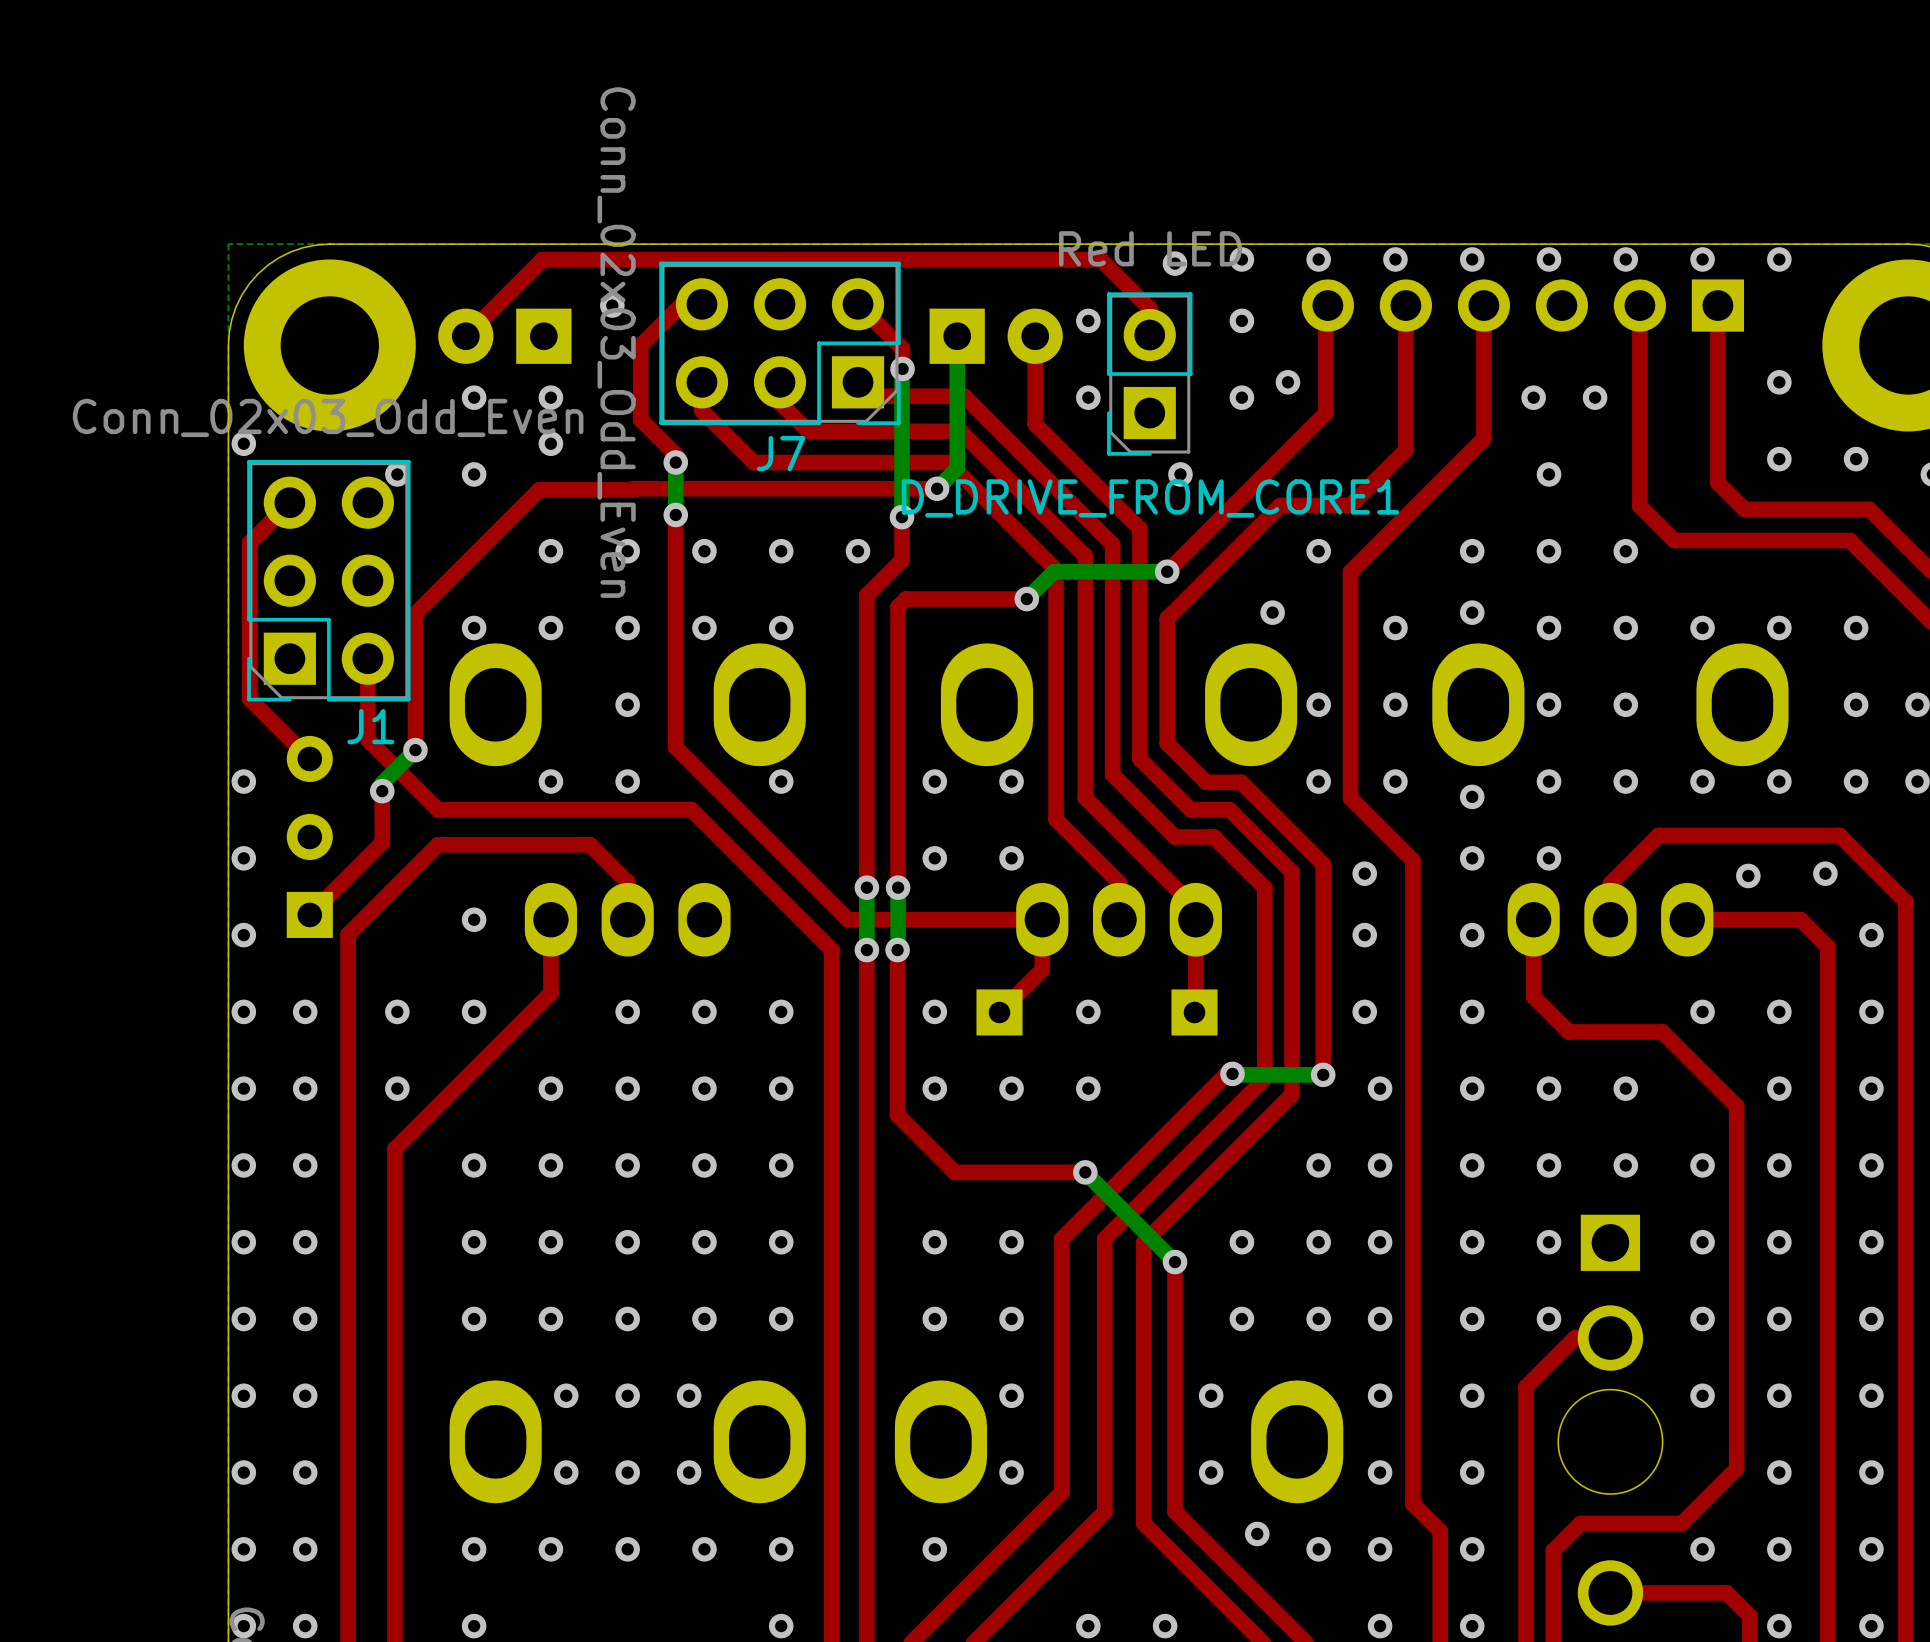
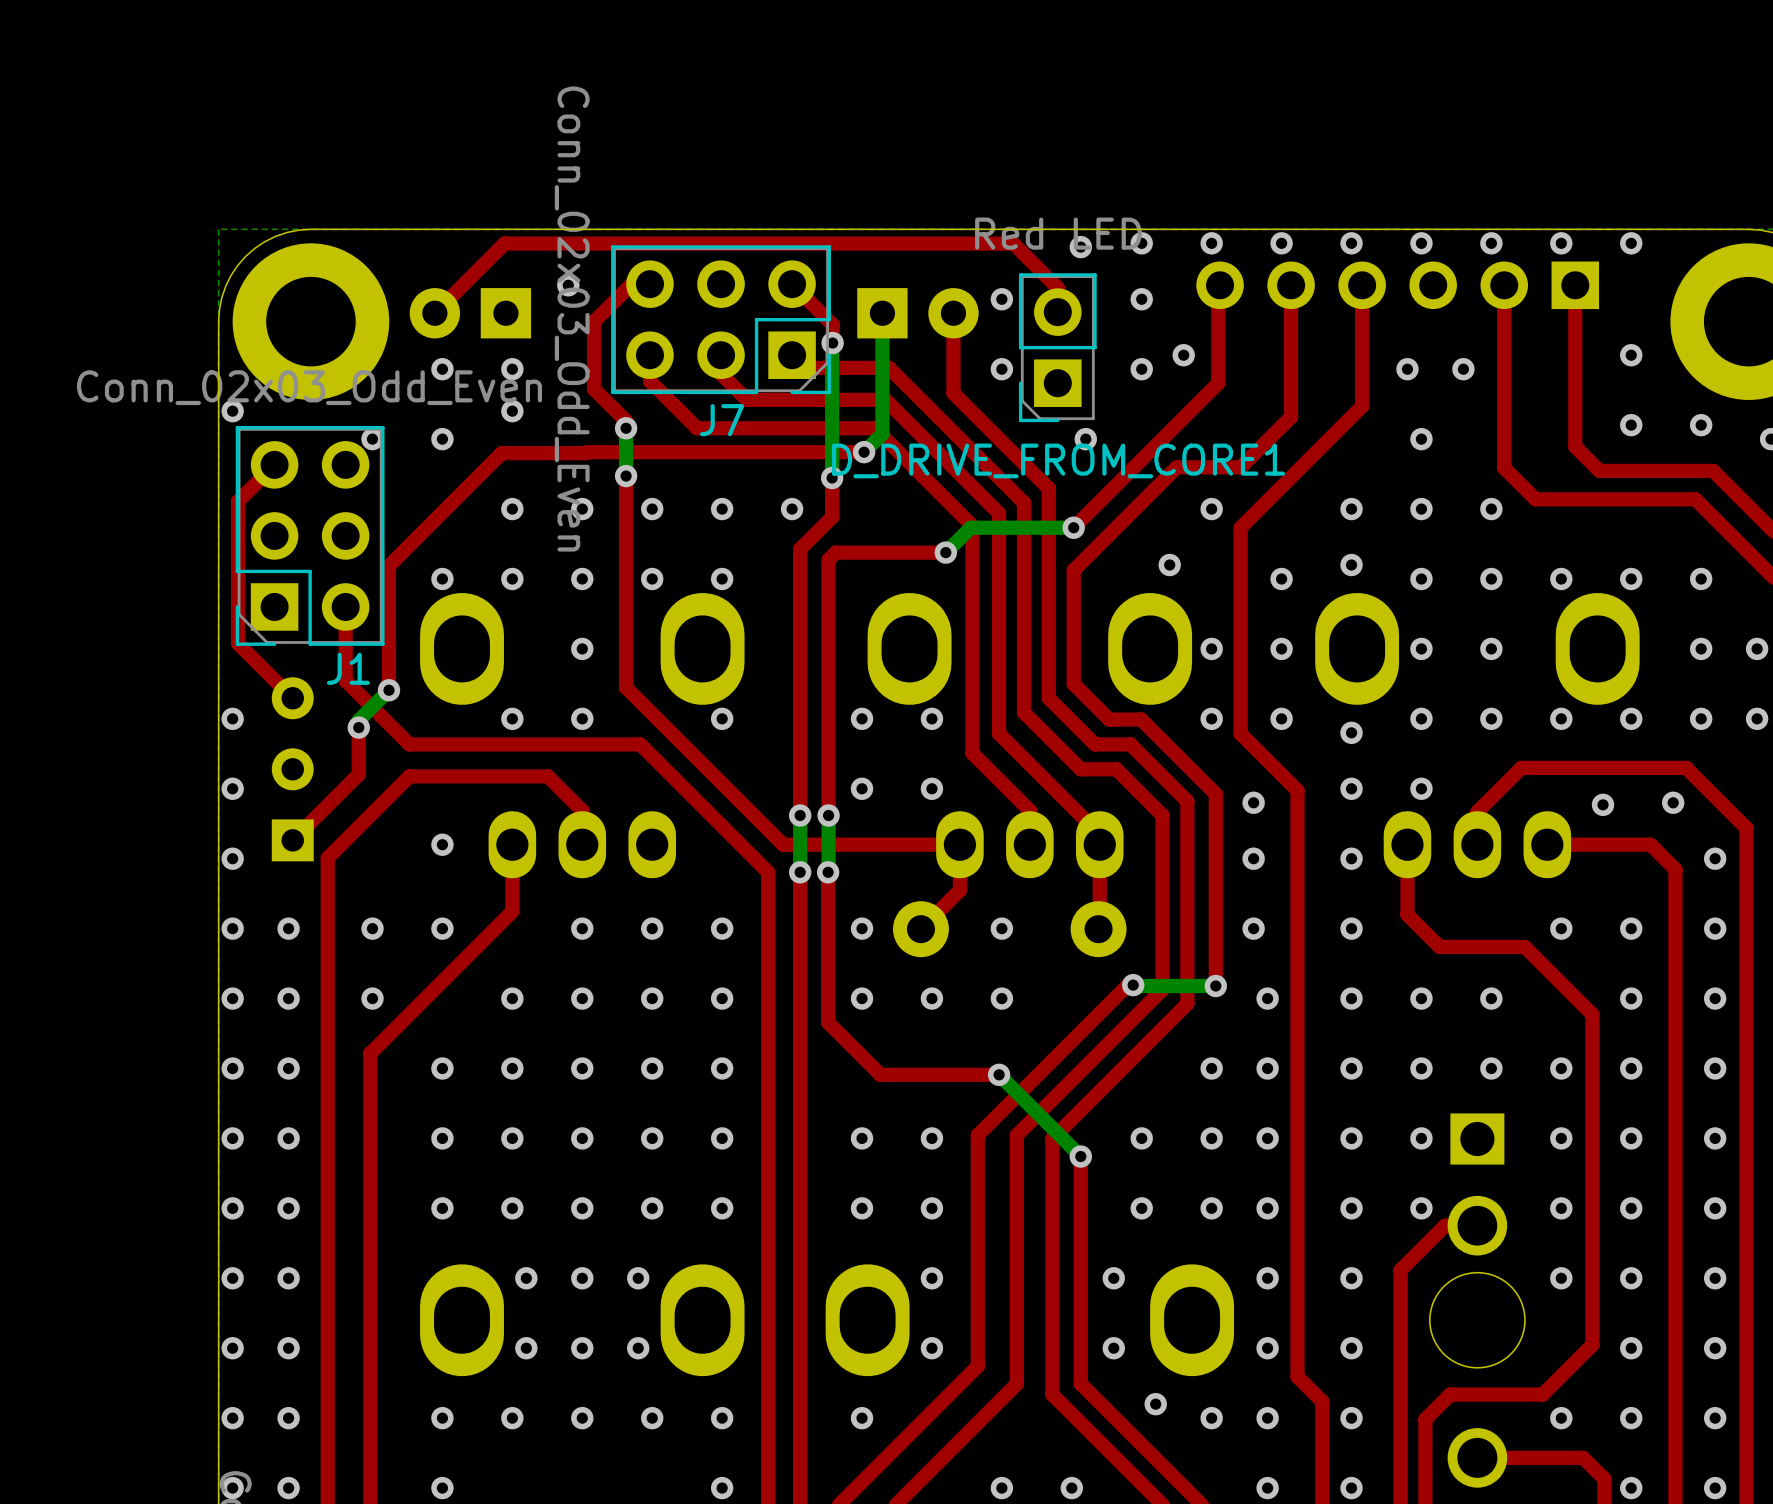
part footprint: [976, 989, 1023, 1036] -> [892, 901, 949, 958]
part footprint: [1171, 989, 1218, 1036] -> [1070, 901, 1127, 958]

